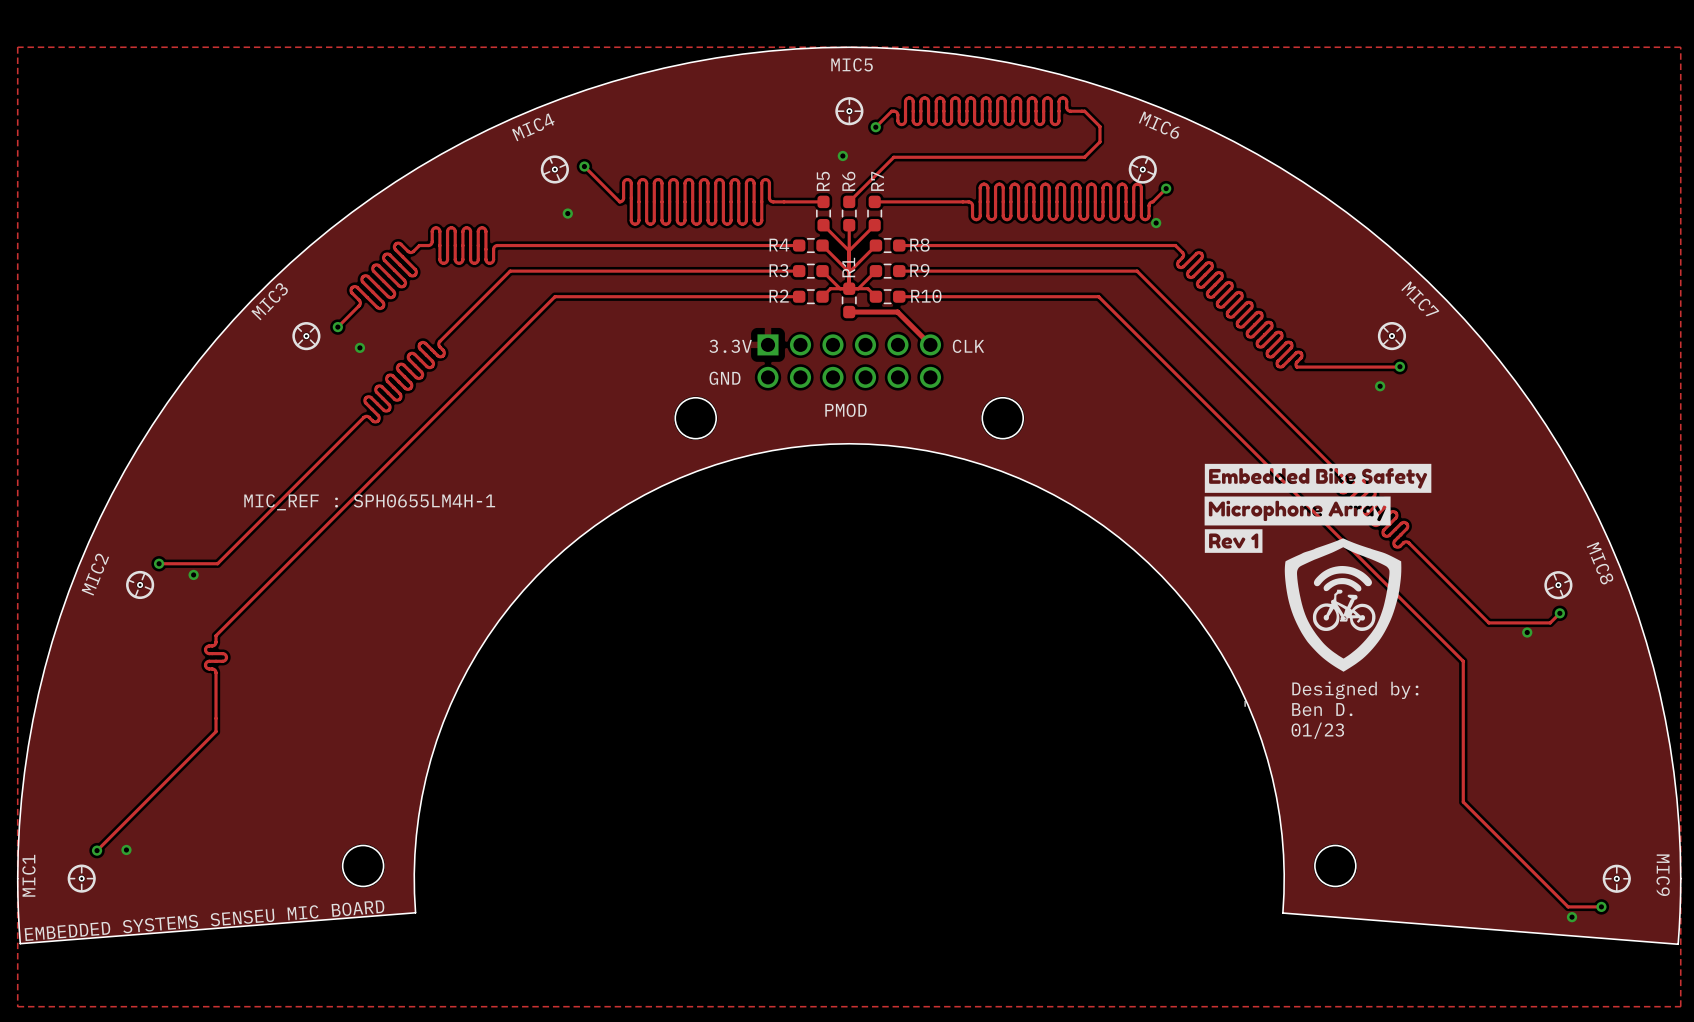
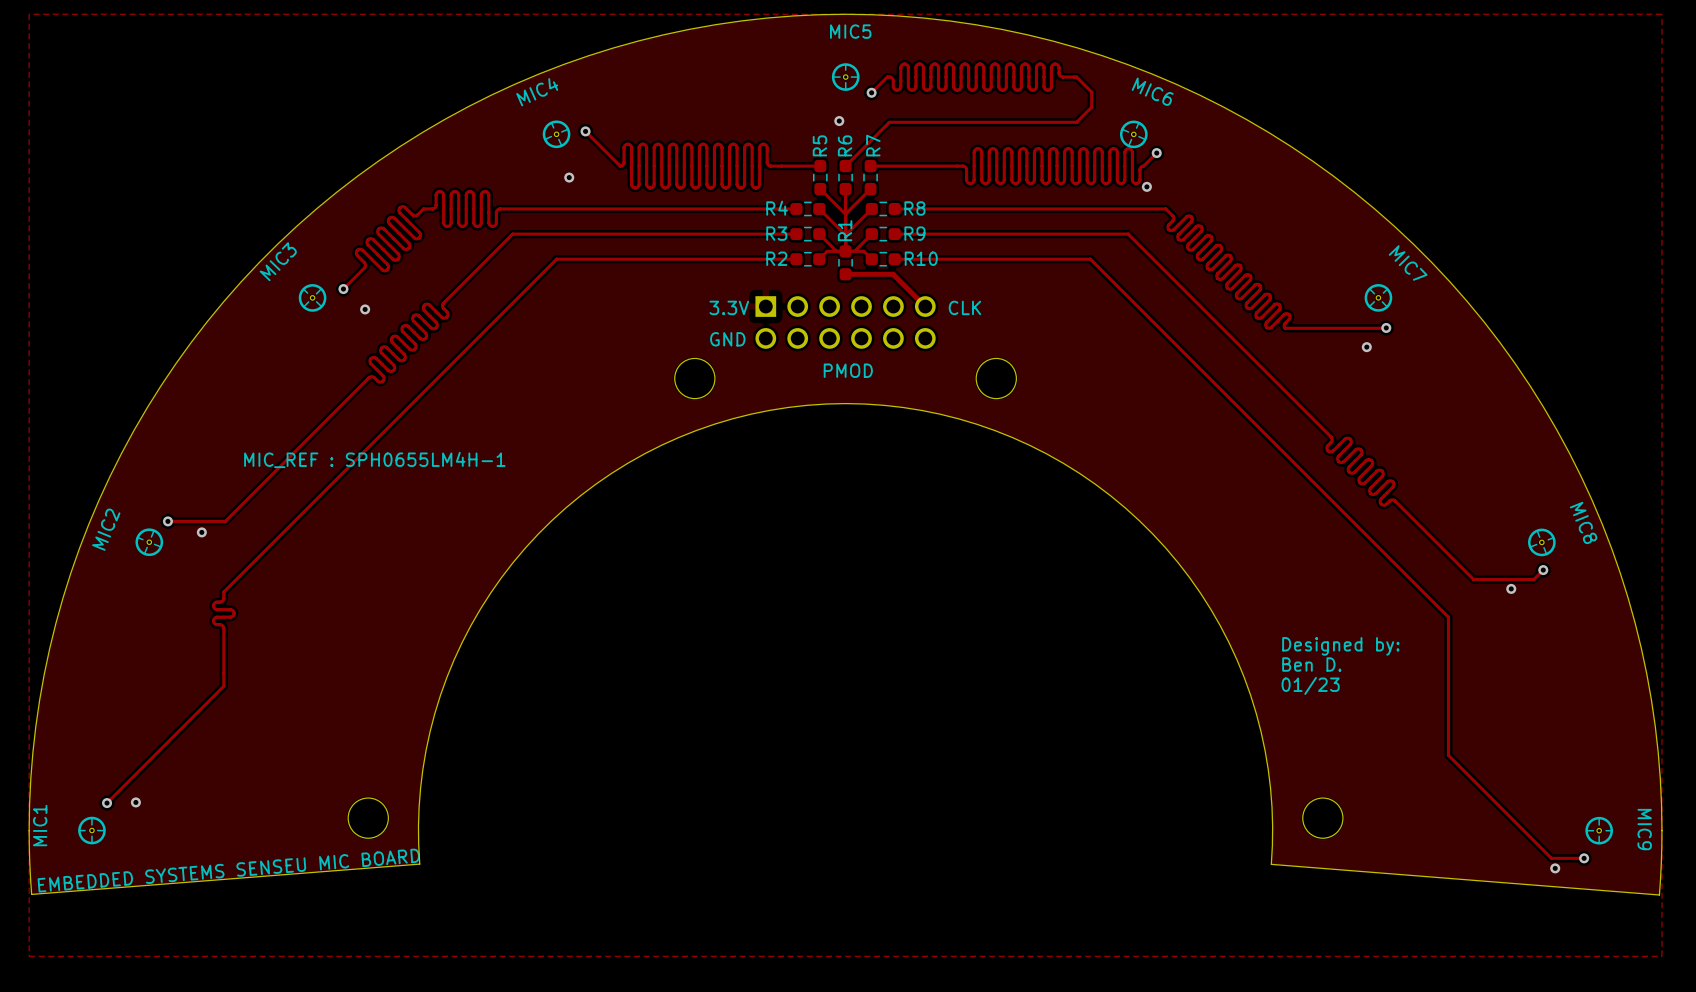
drawing: [1204, 463, 1432, 707] -> none

